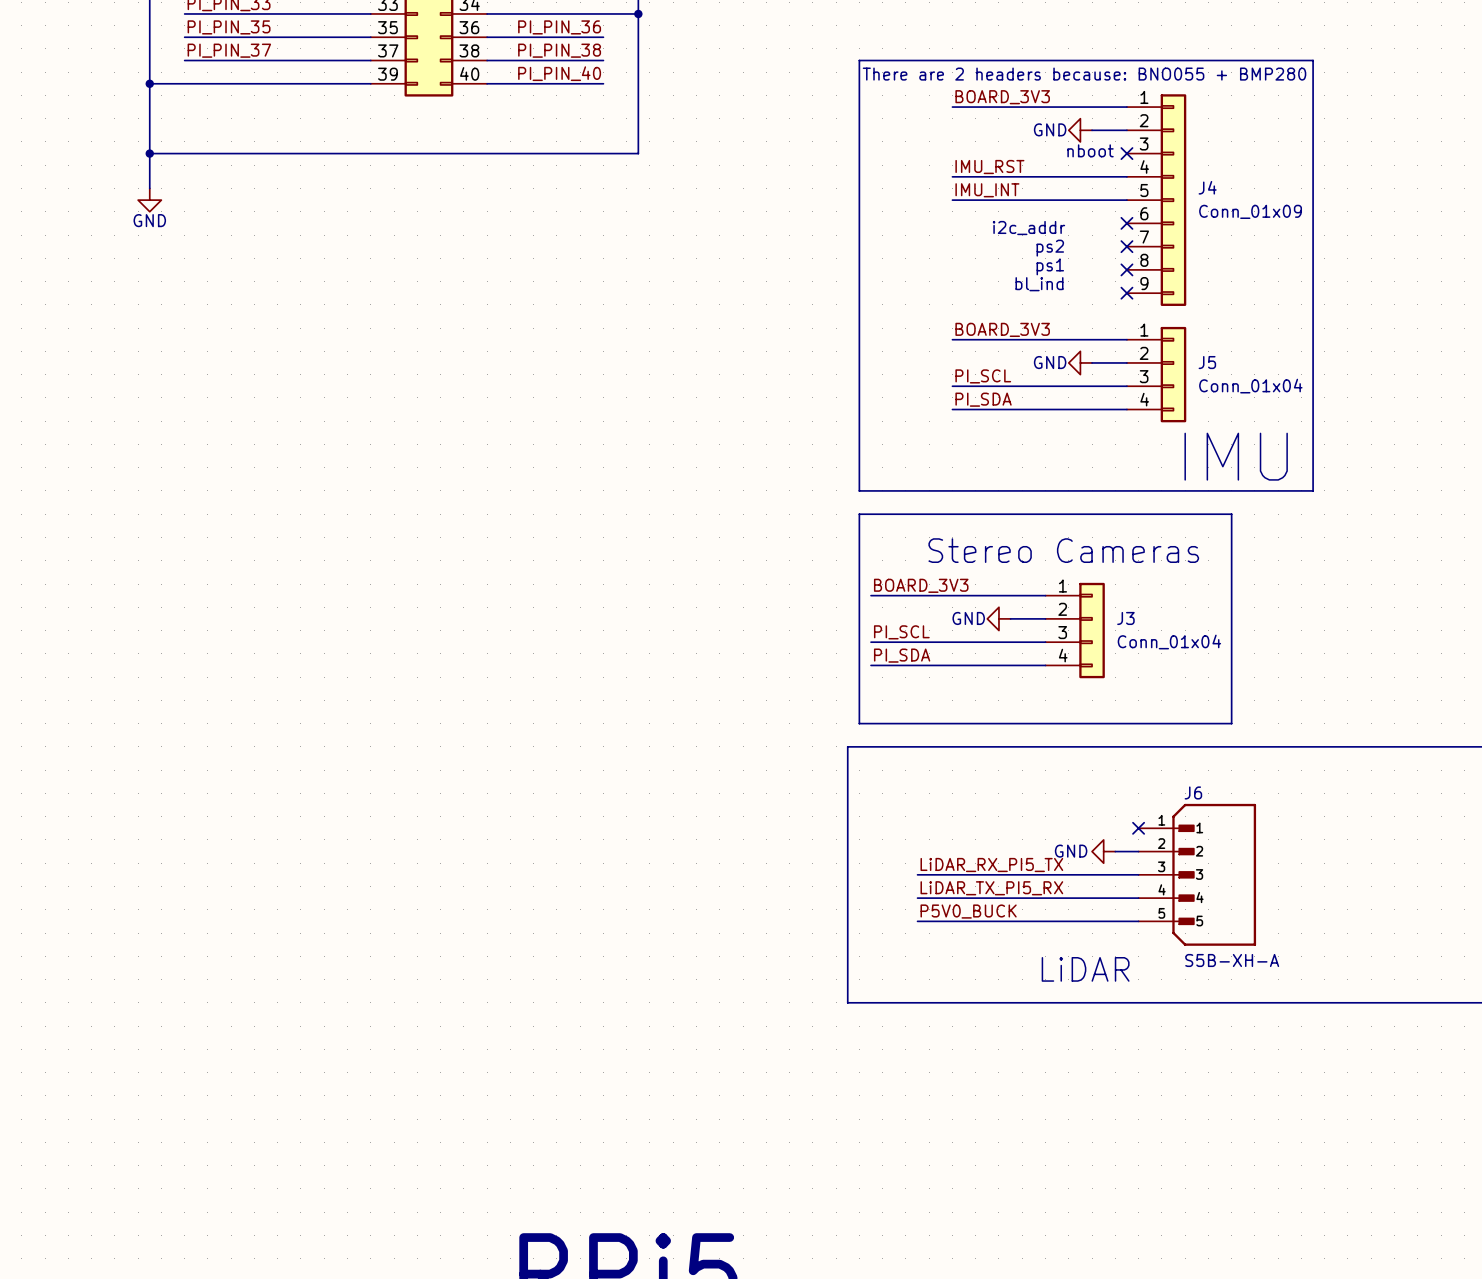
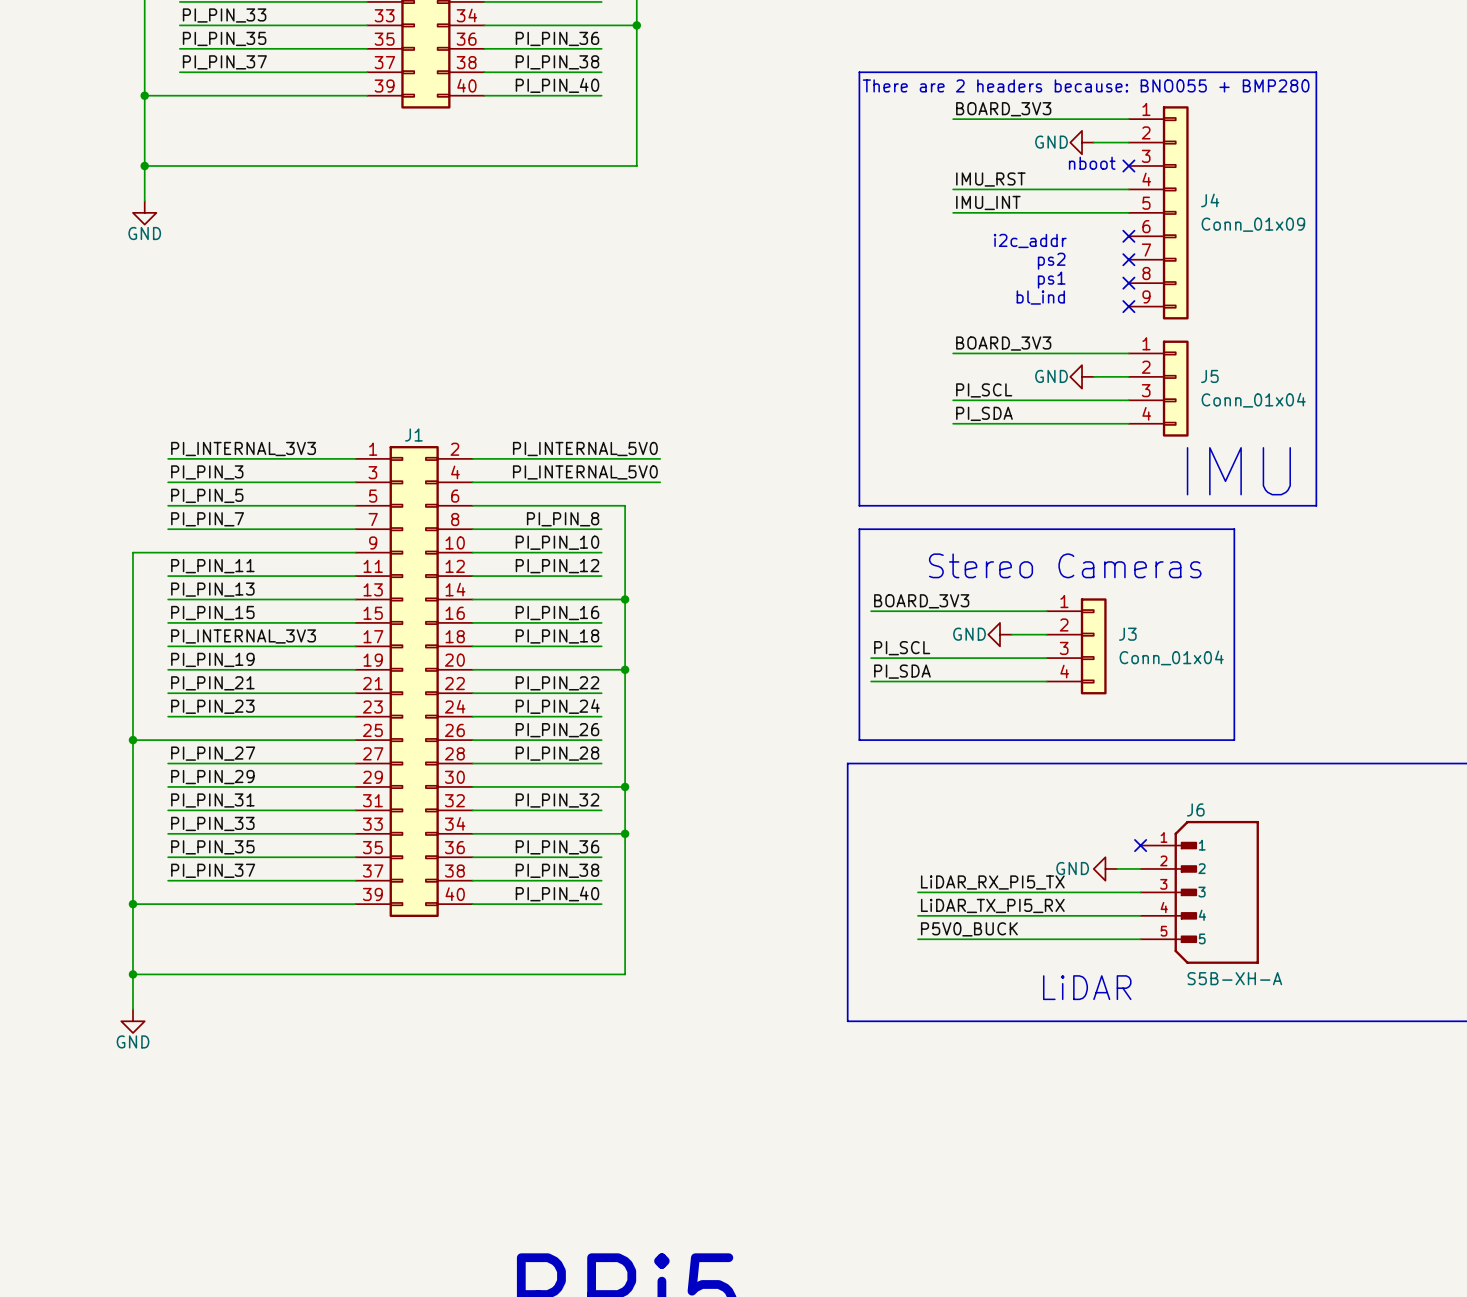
label: none -> PI_INTERNAL_3V3 (243, 449)
label: none -> PI_INTERNAL_5V0 (585, 449)
wire: none -> (168, 458) (355, 458)
wire: none -> (472, 458) (660, 458)
label: none -> PI_PIN_3 (207, 472)
label: none -> PI_INTERNAL_5V0 (585, 472)
wire: none -> (168, 482) (355, 482)
wire: none -> (472, 482) (660, 482)
label: none -> PI_PIN_5 (207, 495)
wire: none -> (168, 505) (355, 505)
wire: none -> (472, 505) (625, 505) (625, 974) (132, 974)
label: none -> PI_PIN_7 (207, 519)
label: none -> PI_PIN_8 (563, 519)
wire: none -> (168, 529) (355, 529)
wire: none -> (472, 529) (601, 529)
label: none -> PI_PIN_10 (557, 542)
wire: none -> (355, 552) (132, 552) (132, 1009)
wire: none -> (472, 552) (601, 552)
label: none -> PI_PIN_11 (212, 566)
label: none -> PI_PIN_12 (557, 566)
wire: none -> (168, 576) (355, 576)
wire: none -> (472, 576) (601, 576)
label: none -> PI_PIN_13 (212, 589)
wire: none -> (168, 599) (355, 599)
wire: none -> (472, 599) (625, 599)
junction: none -> (625, 599)
label: none -> PI_PIN_15 (212, 613)
label: none -> PI_PIN_16 (557, 613)
wire: none -> (168, 622) (355, 622)
wire: none -> (472, 622) (601, 622)
label: none -> PI_INTERNAL_3V3 (243, 636)
label: none -> PI_PIN_18 (557, 636)
wire: none -> (168, 646) (355, 646)
wire: none -> (472, 646) (601, 646)
label: none -> PI_PIN_19 (212, 659)
wire: none -> (168, 669) (355, 669)
wire: none -> (472, 669) (625, 669)
junction: none -> (625, 669)
J1: none -> (414, 681)
label: none -> PI_PIN_21 (212, 683)
label: none -> PI_PIN_22 (557, 683)
wire: none -> (168, 693) (355, 693)
wire: none -> (472, 693) (601, 693)
label: none -> PI_PIN_23 (212, 706)
label: none -> PI_PIN_24 (557, 706)
wire: none -> (168, 716) (355, 716)
wire: none -> (472, 716) (601, 716)
label: none -> PI_PIN_26 (557, 730)
wire: none -> (132, 740) (355, 740)
junction: none -> (132, 740)
wire: none -> (472, 740) (601, 740)
label: none -> PI_PIN_27 (213, 753)
label: none -> PI_PIN_28 (557, 753)
wire: none -> (168, 763) (355, 763)
wire: none -> (472, 763) (601, 763)
label: none -> PI_PIN_29 (212, 777)
wire: none -> (168, 786) (355, 786)
wire: none -> (472, 786) (625, 786)
junction: none -> (625, 786)
label: none -> PI_PIN_31 (212, 800)
label: none -> PI_PIN_32 (557, 800)
wire: none -> (168, 810) (355, 810)
wire: none -> (472, 810) (601, 810)
label: none -> PI_PIN_33 (212, 823)
wire: none -> (168, 833) (355, 833)
wire: none -> (472, 833) (625, 833)
junction: none -> (625, 833)
label: none -> PI_PIN_35 (212, 847)
label: none -> PI_PIN_36 (557, 847)
wire: none -> (168, 857) (355, 857)
wire: none -> (472, 857) (601, 857)
label: none -> PI_PIN_37 (213, 870)
label: none -> PI_PIN_38 (557, 870)
wire: none -> (168, 880) (355, 880)
wire: none -> (472, 880) (601, 880)
label: none -> PI_PIN_40 (557, 893)
wire: none -> (132, 904) (355, 904)
junction: none -> (132, 904)
wire: none -> (472, 904) (601, 904)
junction: none -> (132, 974)
power symbol: none -> GND (132, 1021)

